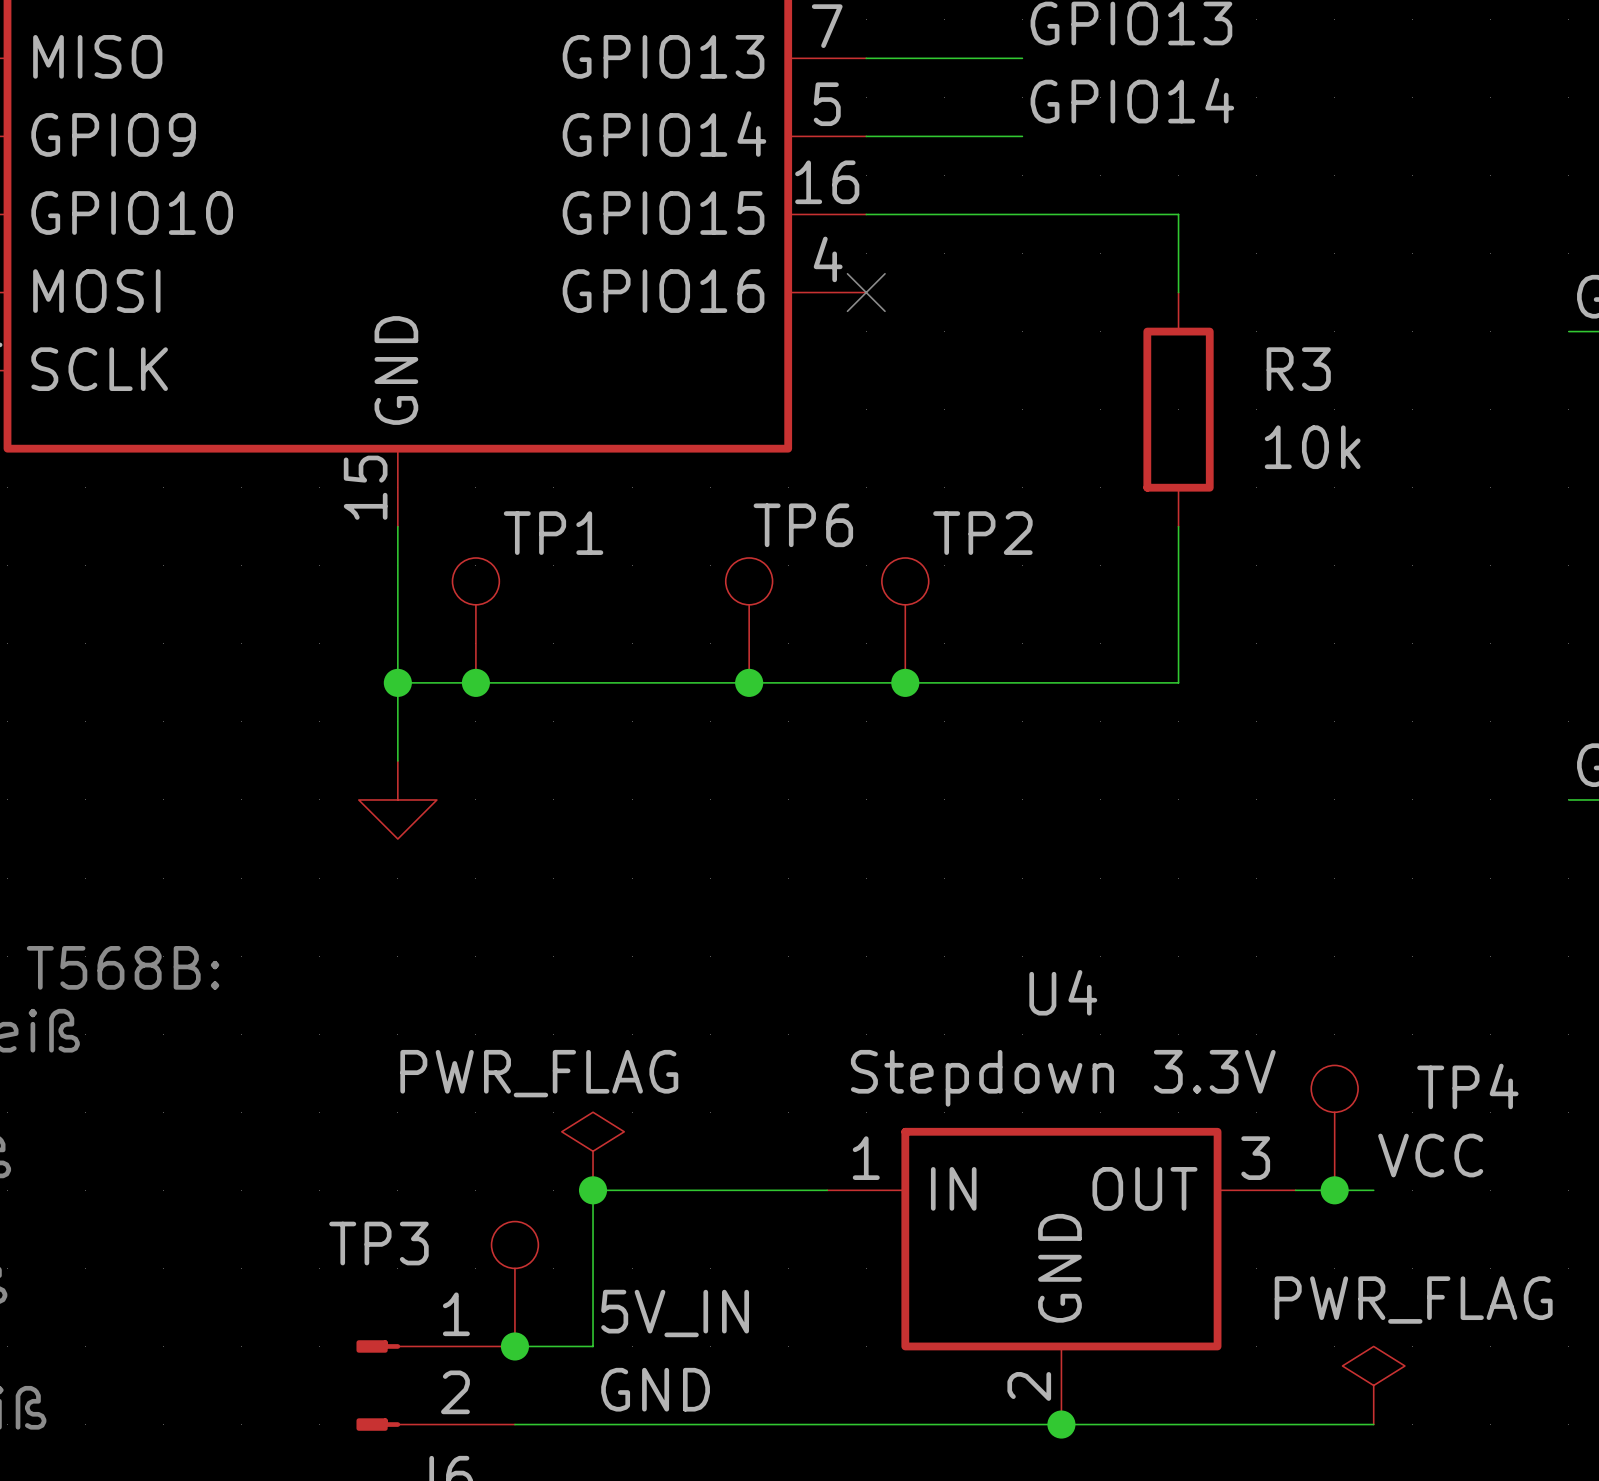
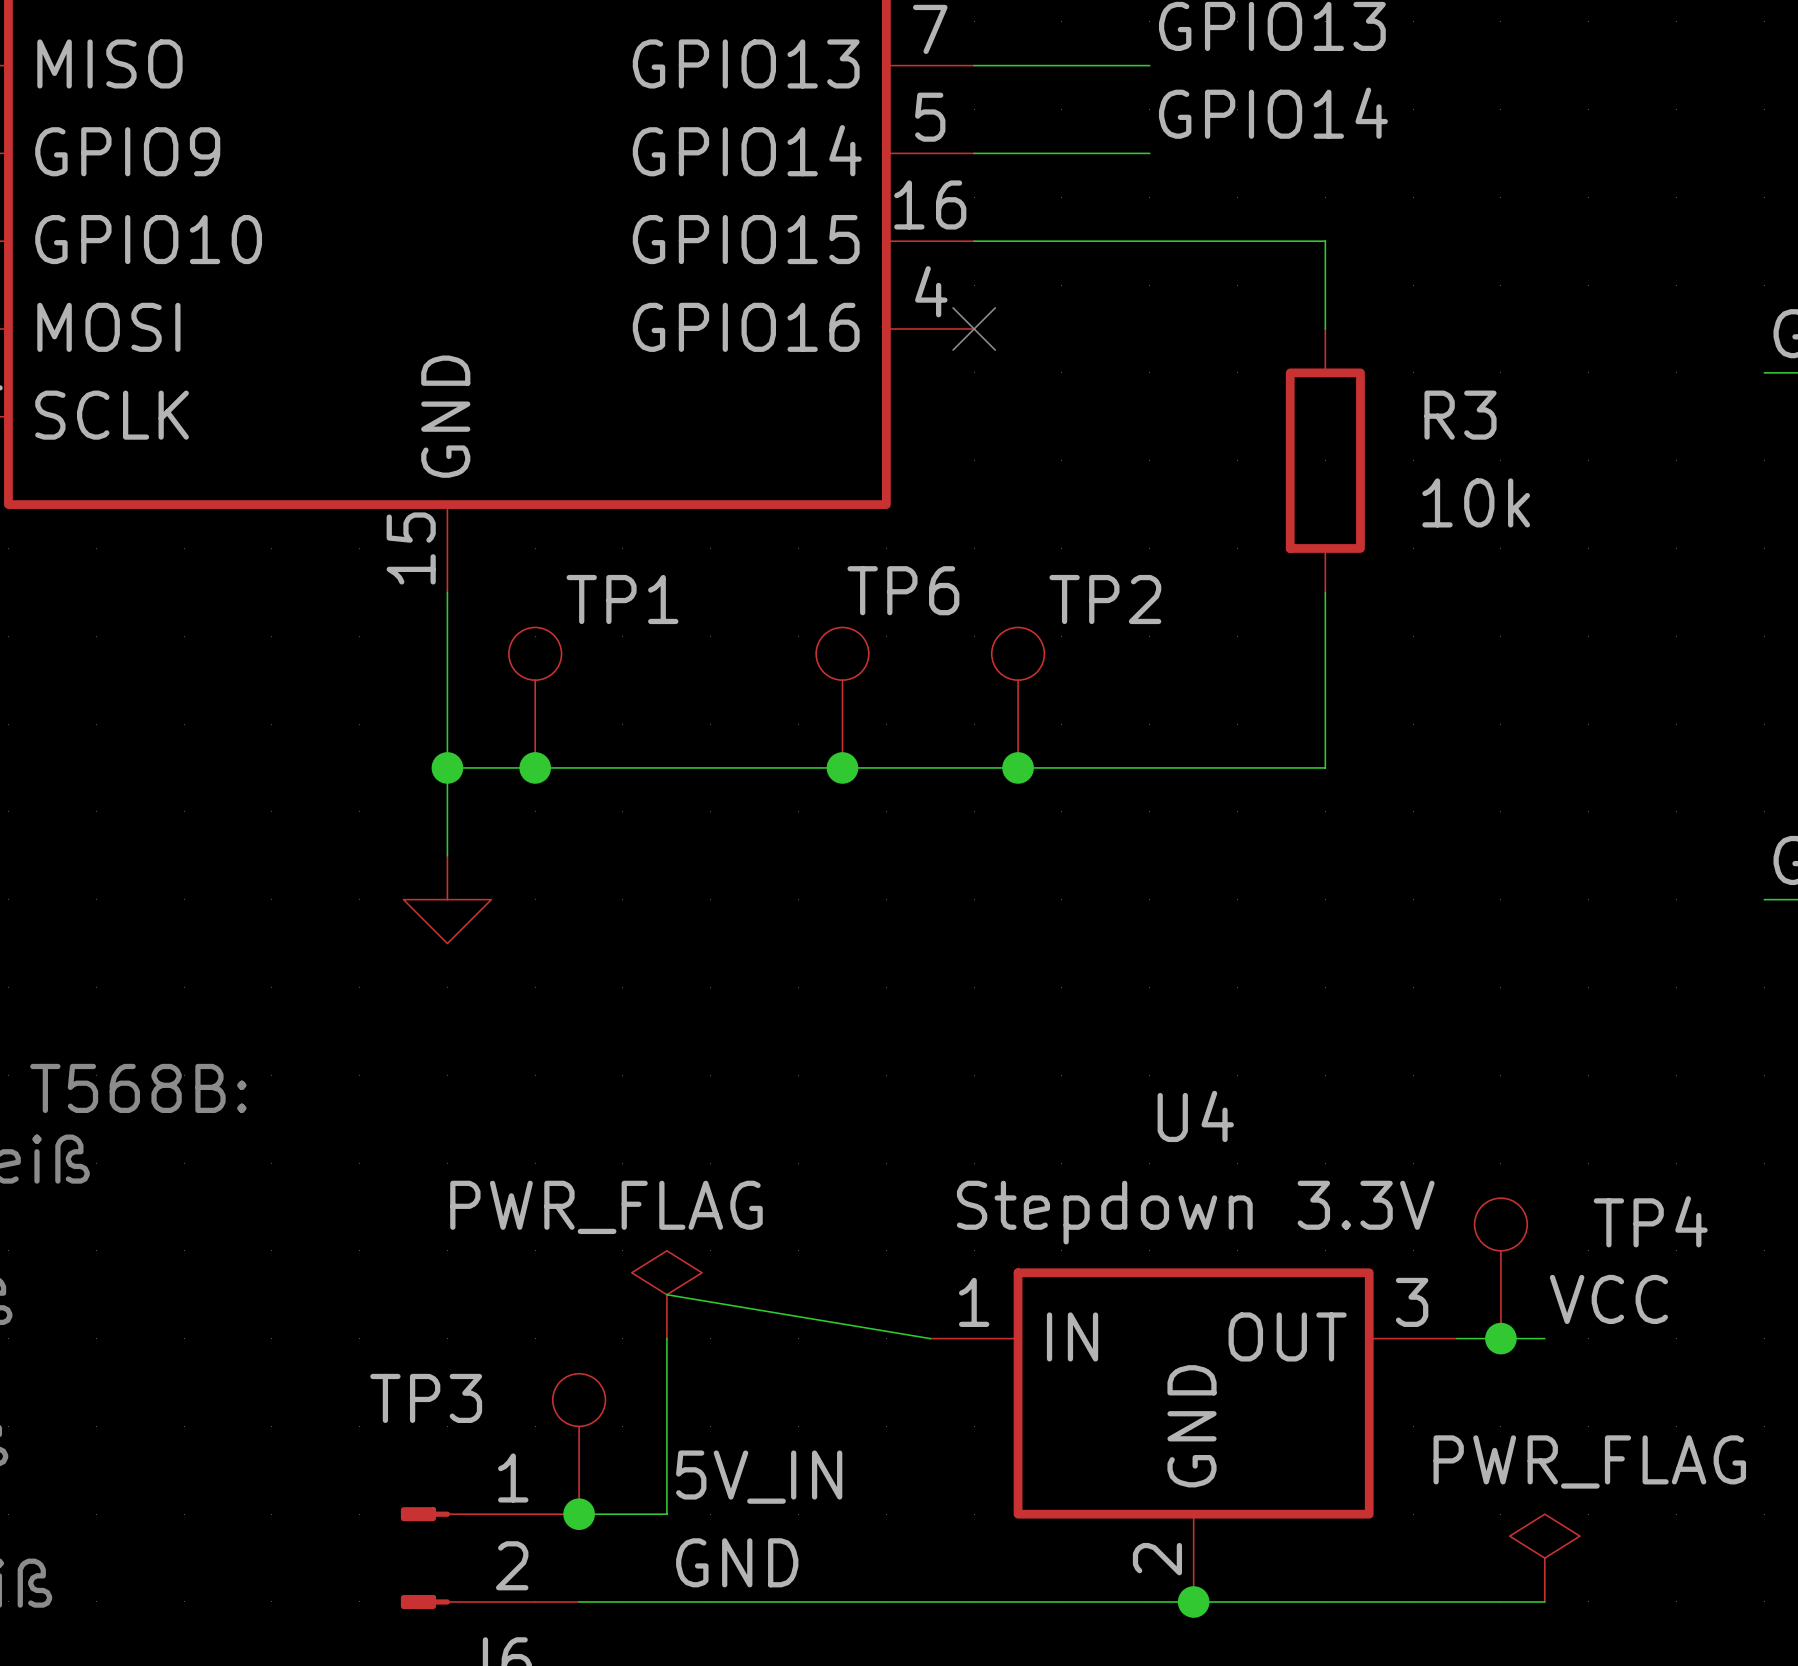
wire: (593, 1190) (827, 1190) -> (666, 1294) (930, 1338)
junction: (593, 1190) -> none

